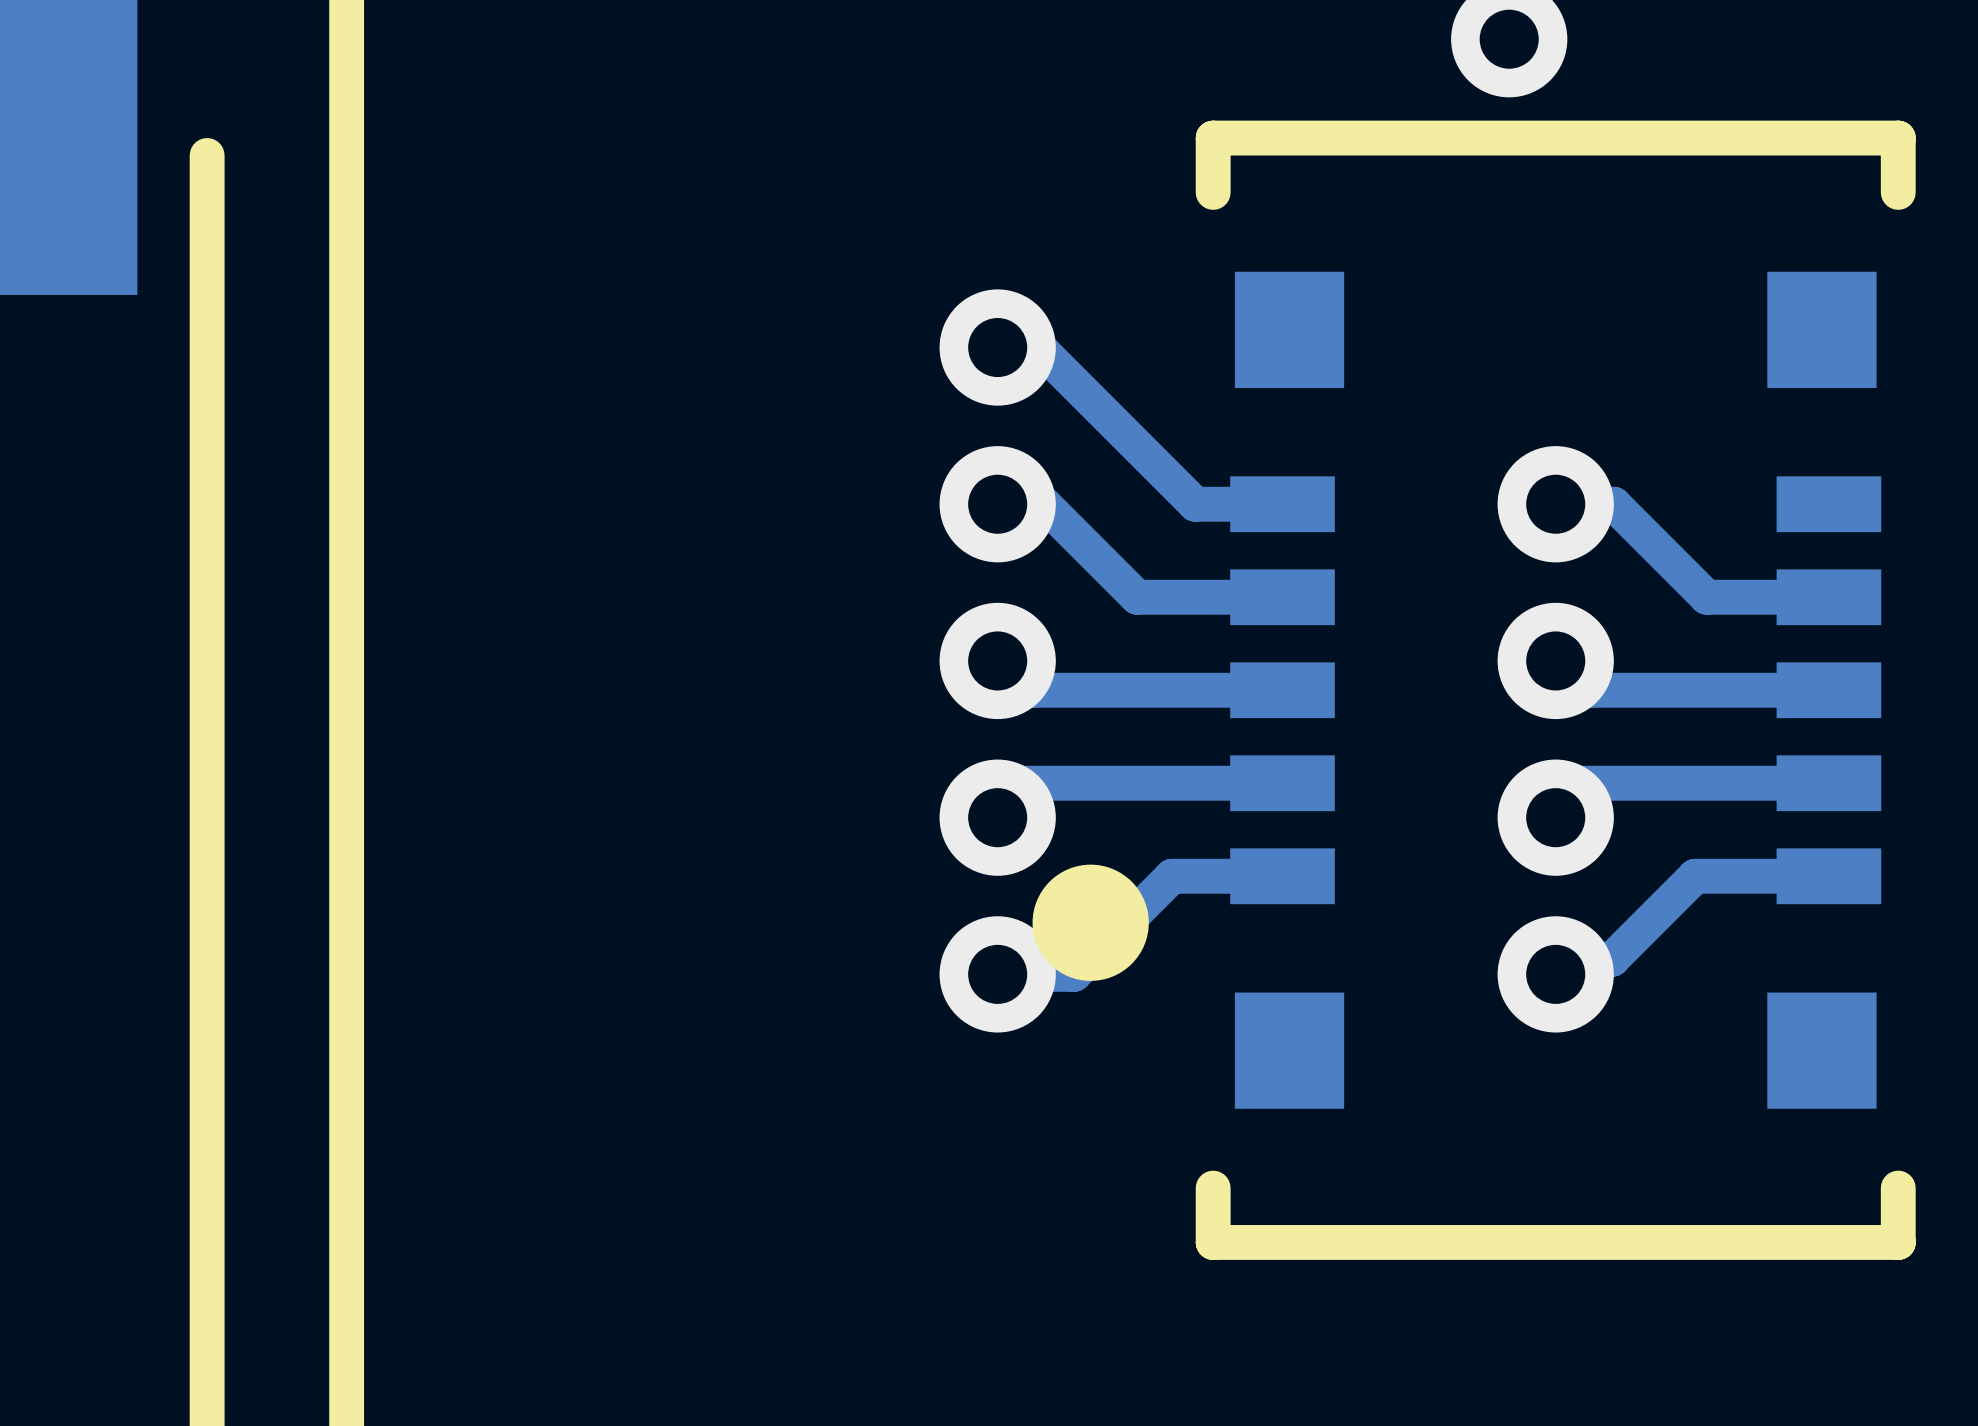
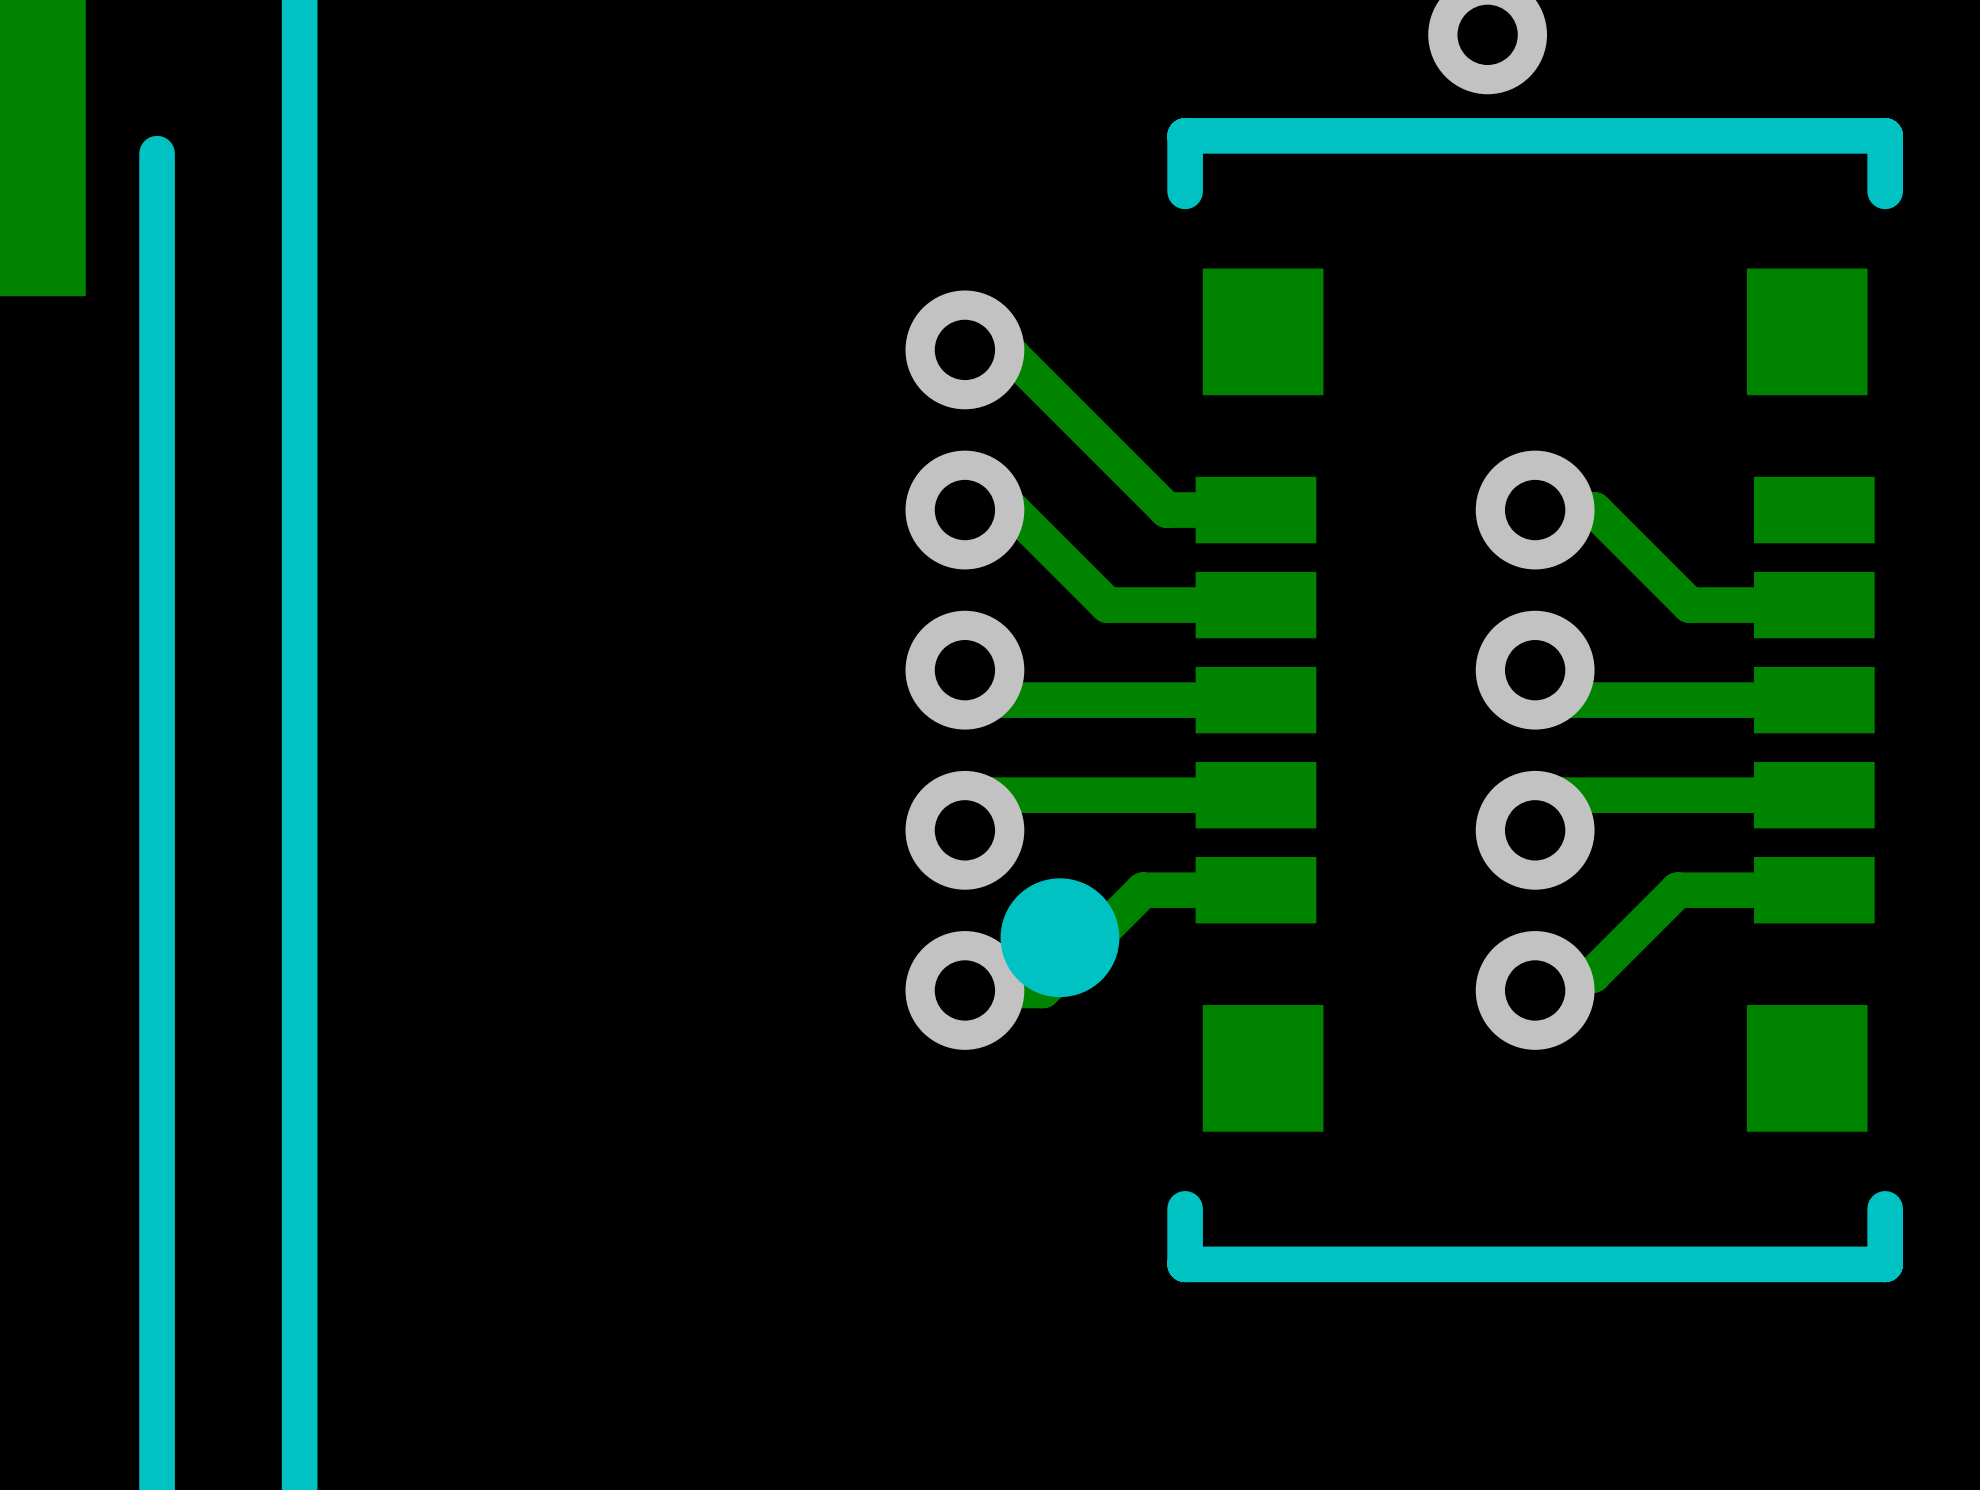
part footprint: [1032, 120, 1916, 1260] -> [1000, 118, 1903, 1283]

